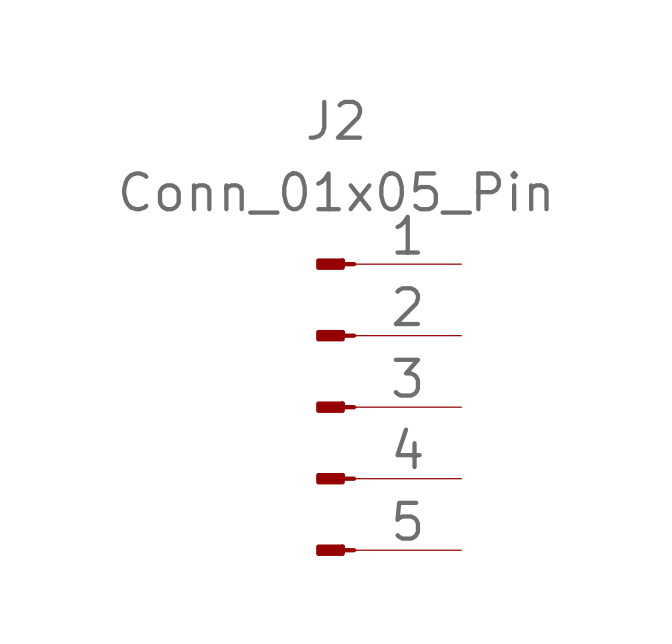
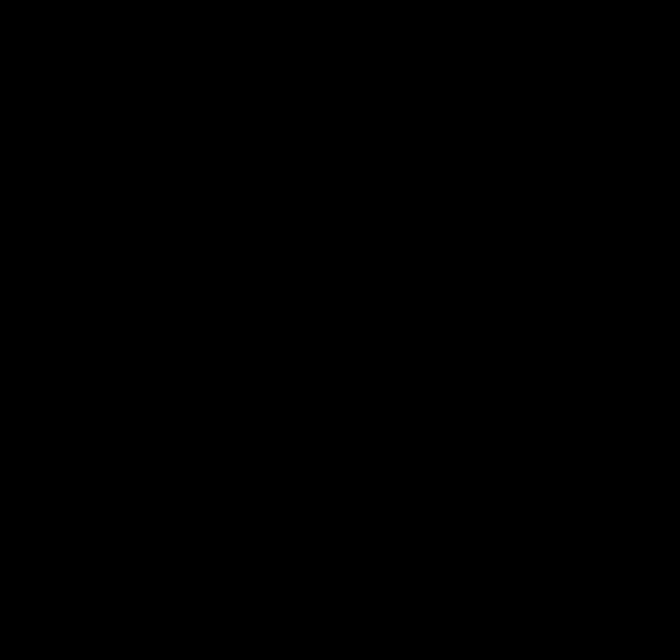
J2: Conn_01x05_Pin (388, 407) -> none

